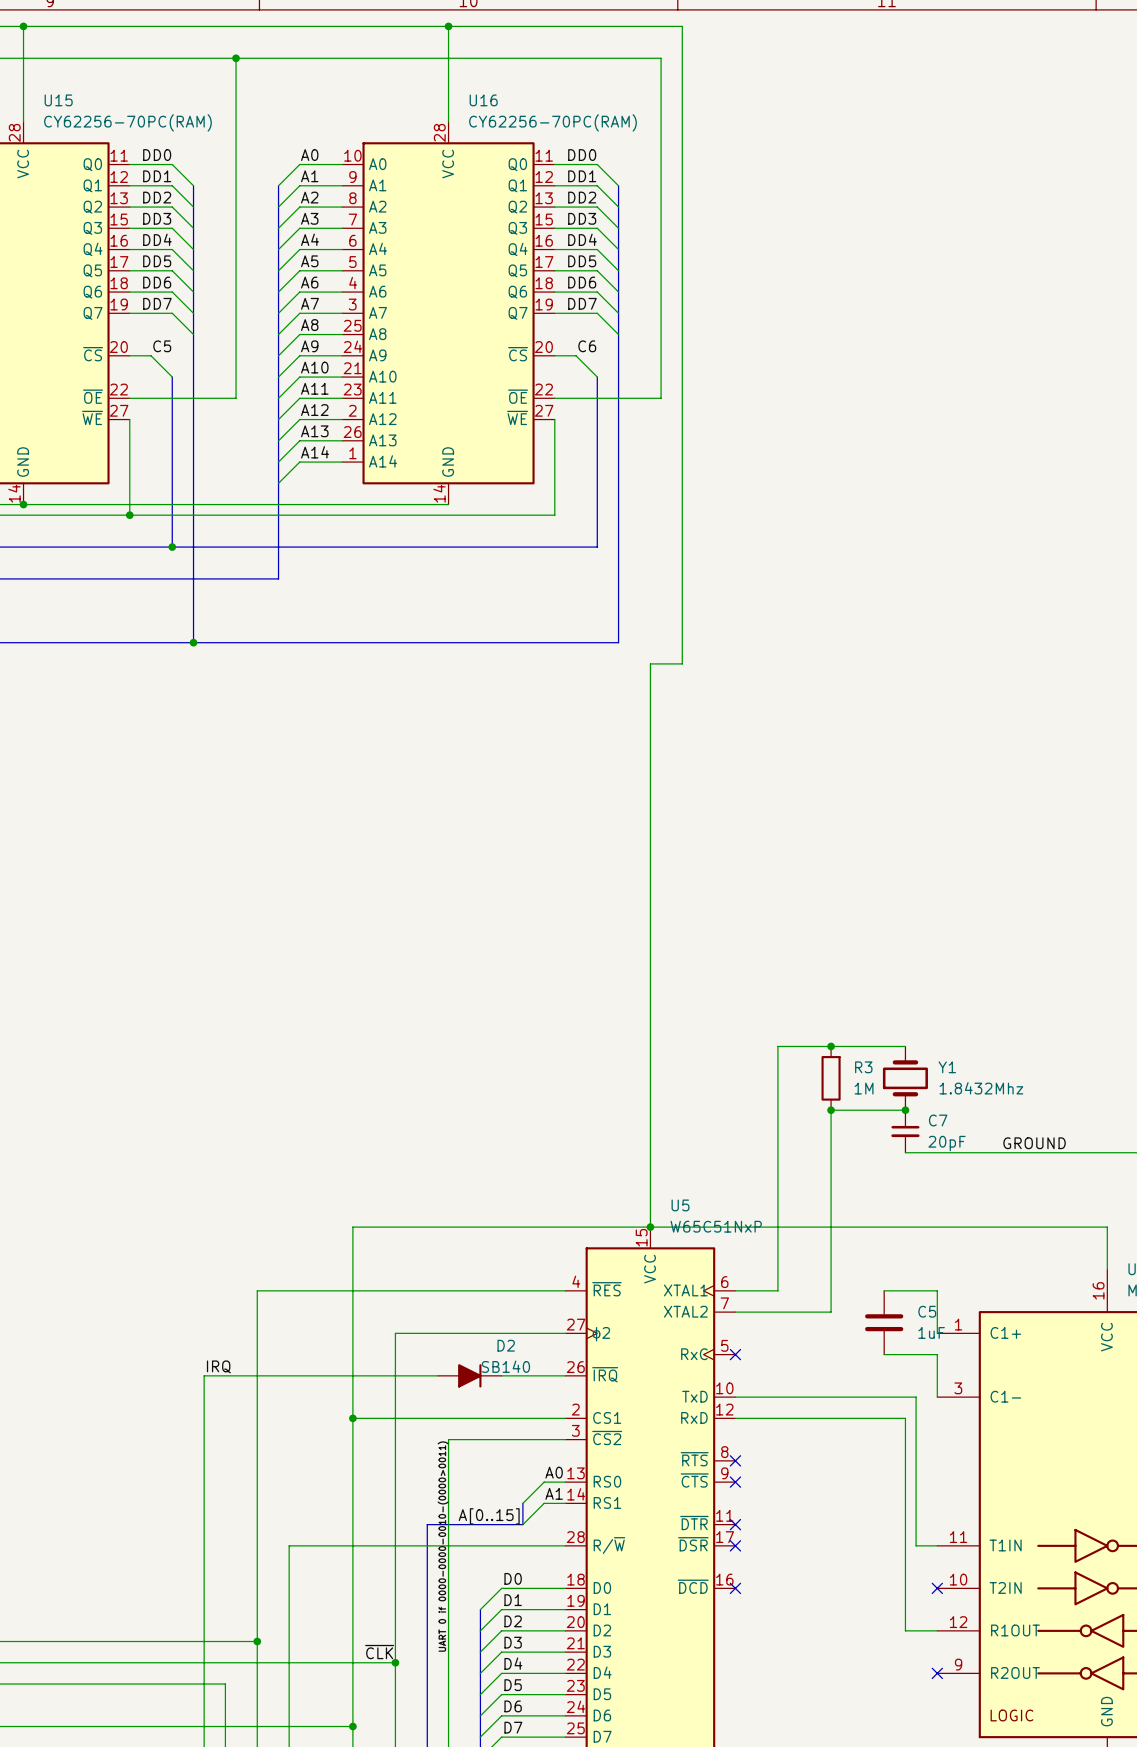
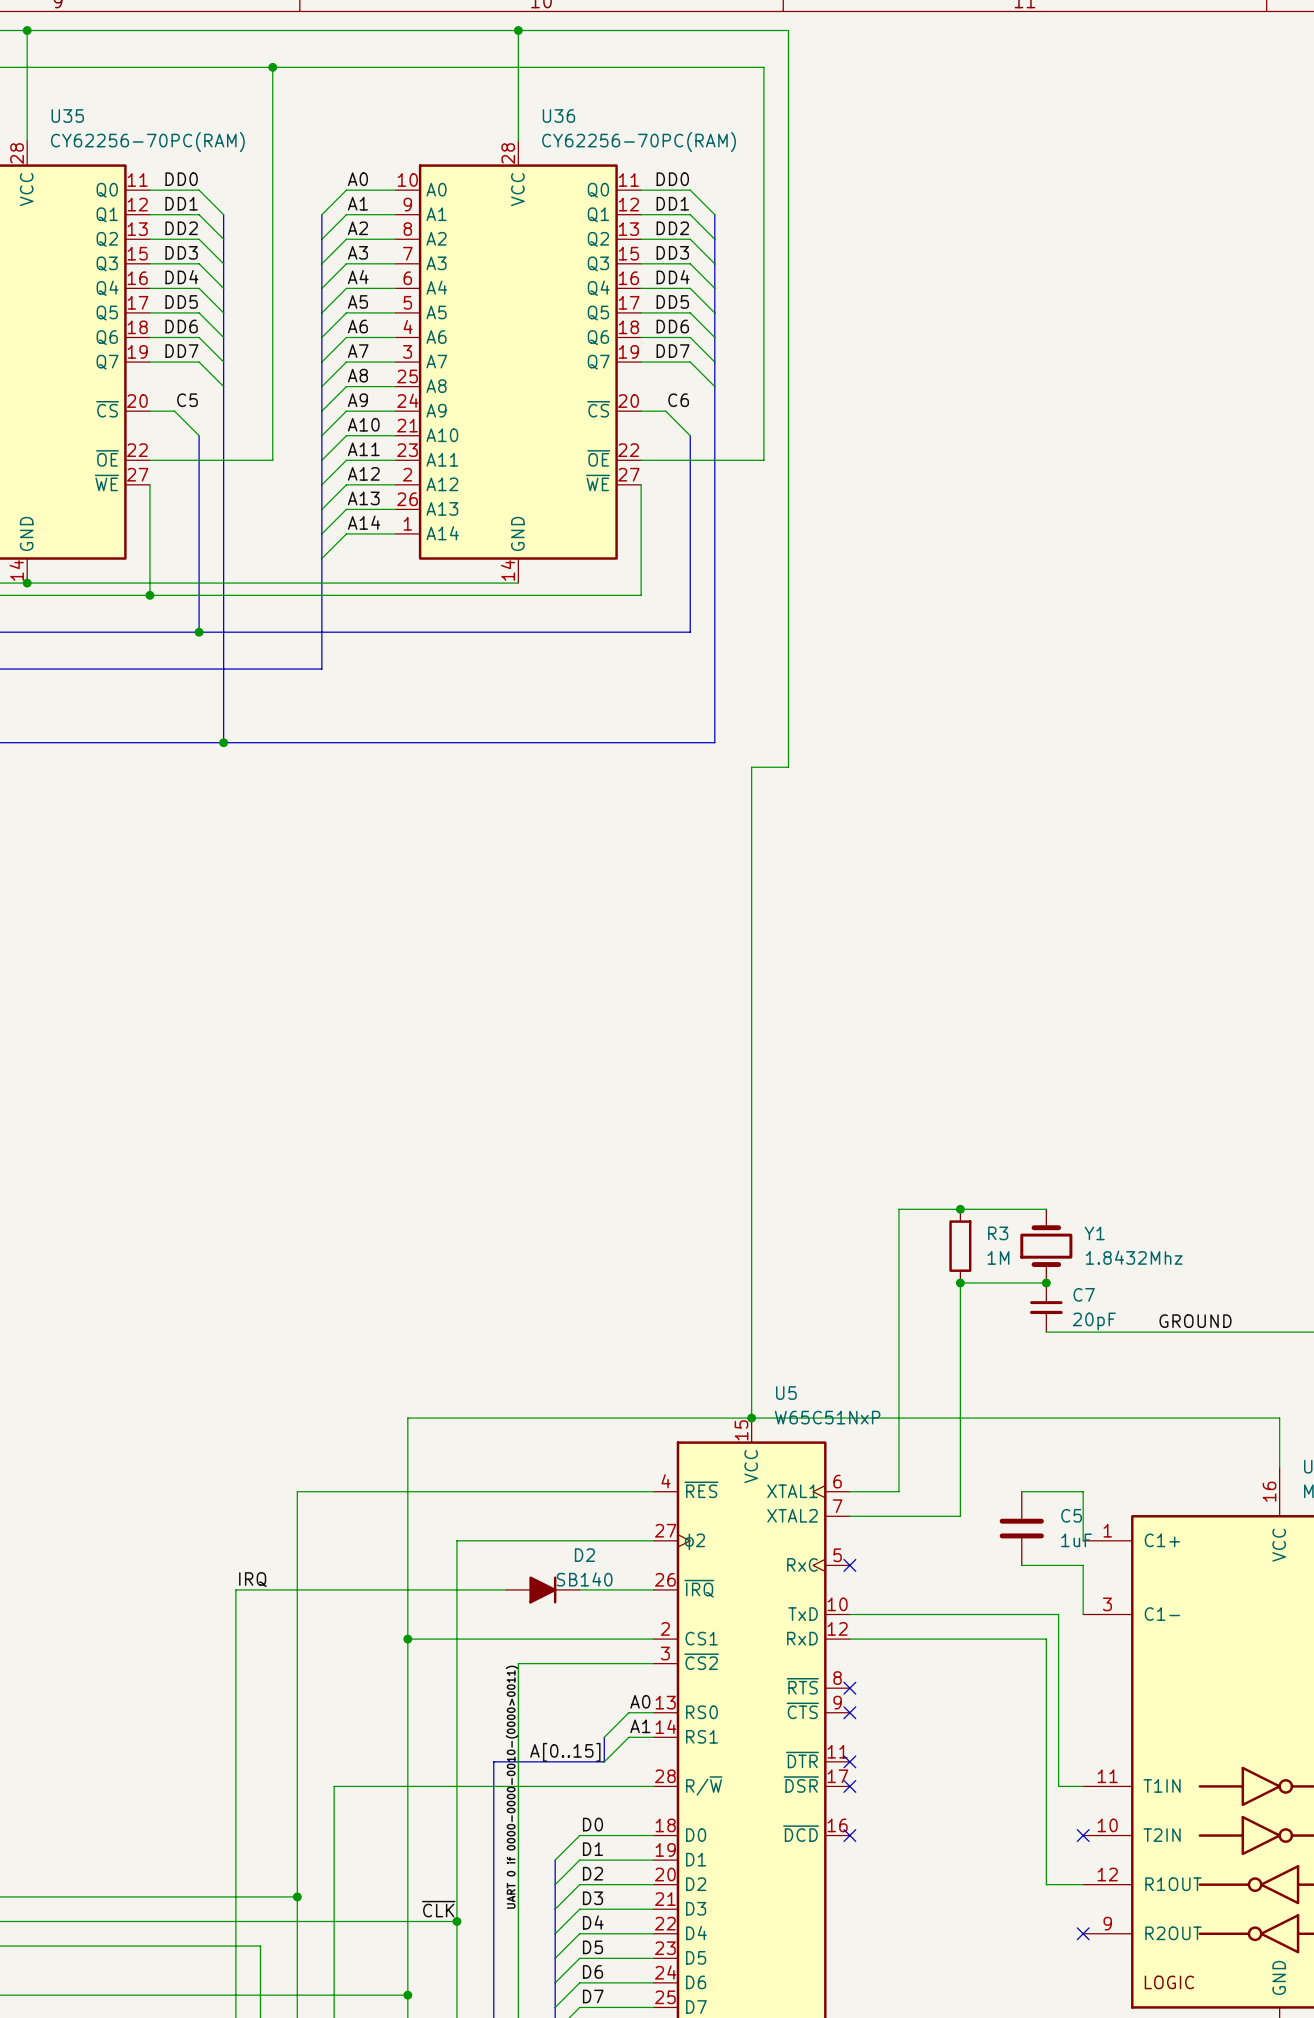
U15 name: U15 (58, 100) -> U35 (67, 116)
U16 name: U16 (483, 100) -> U36 (558, 116)

